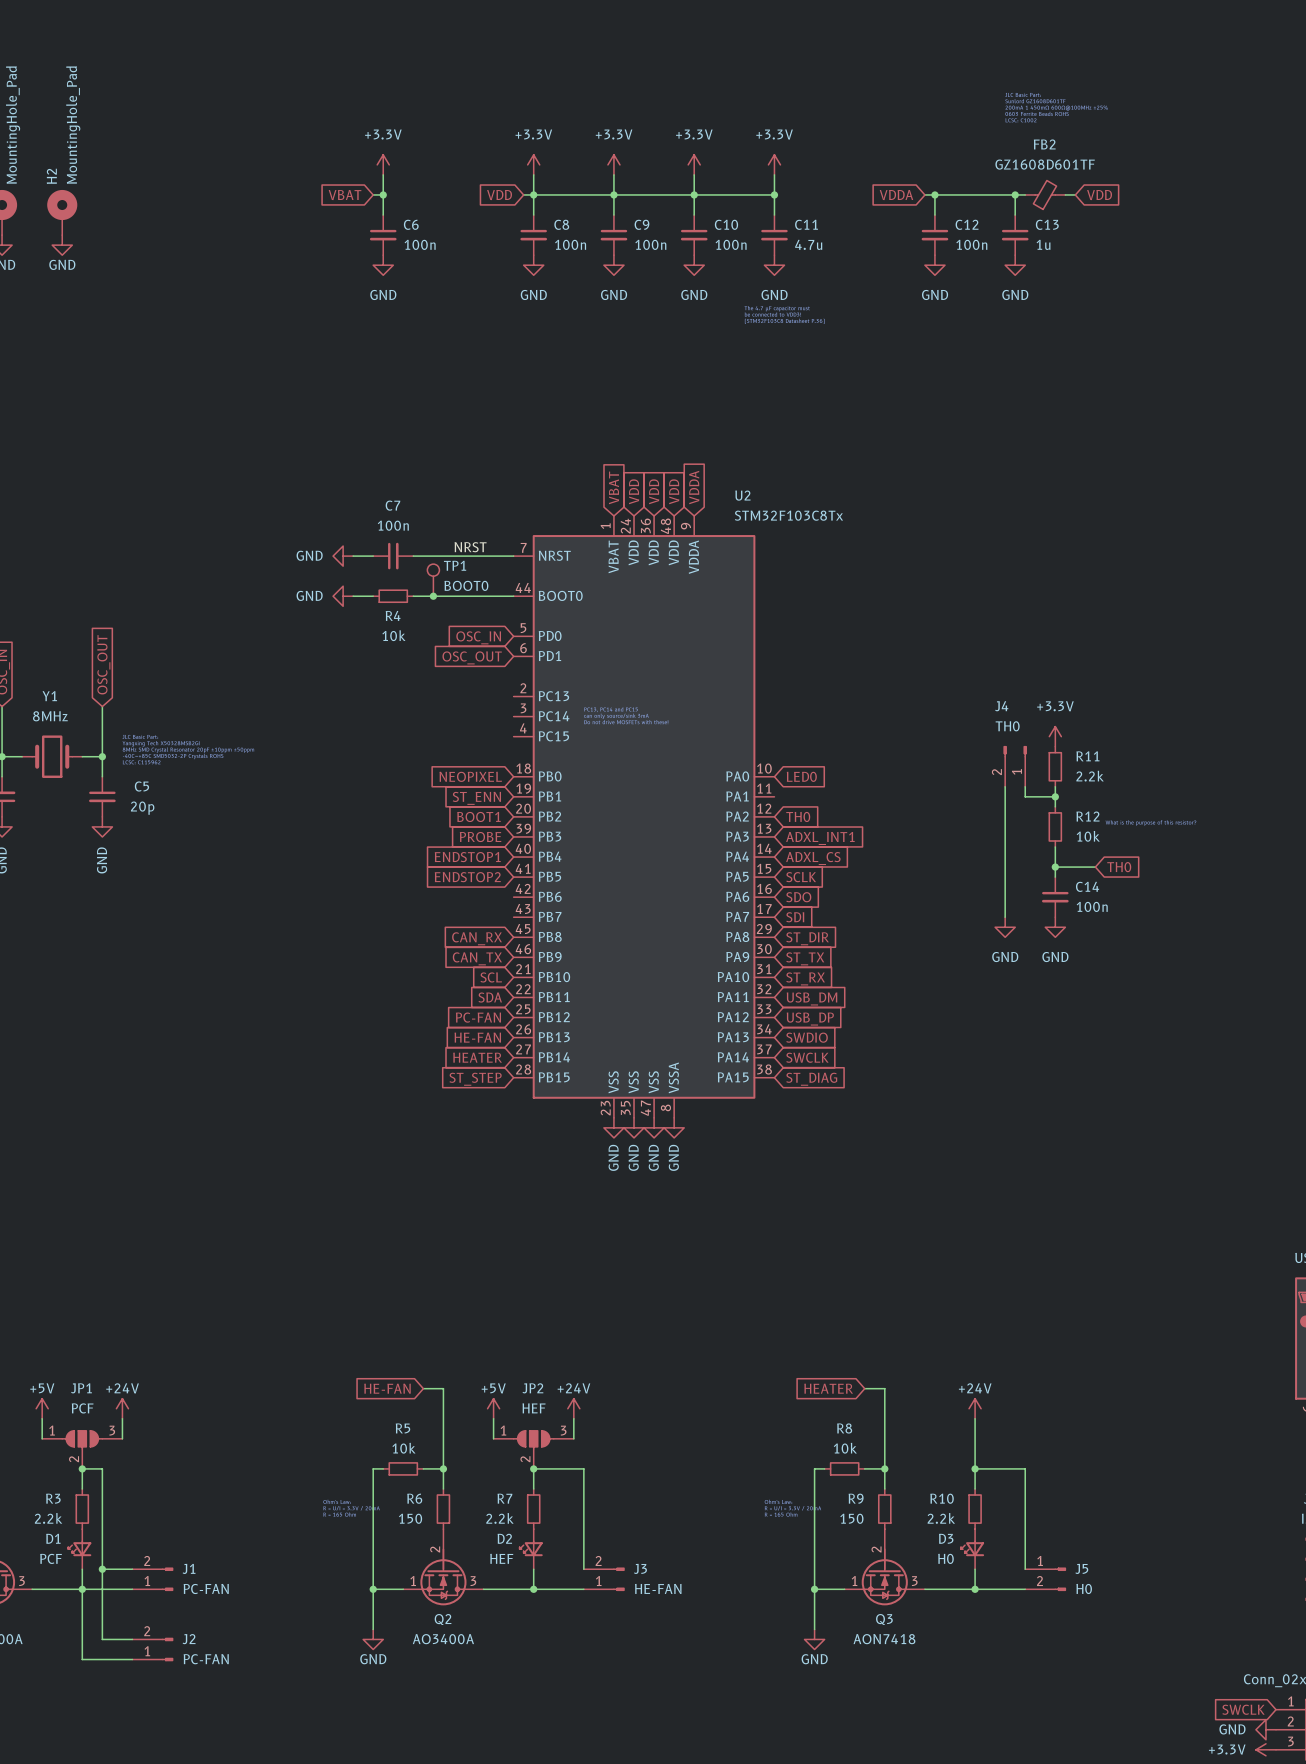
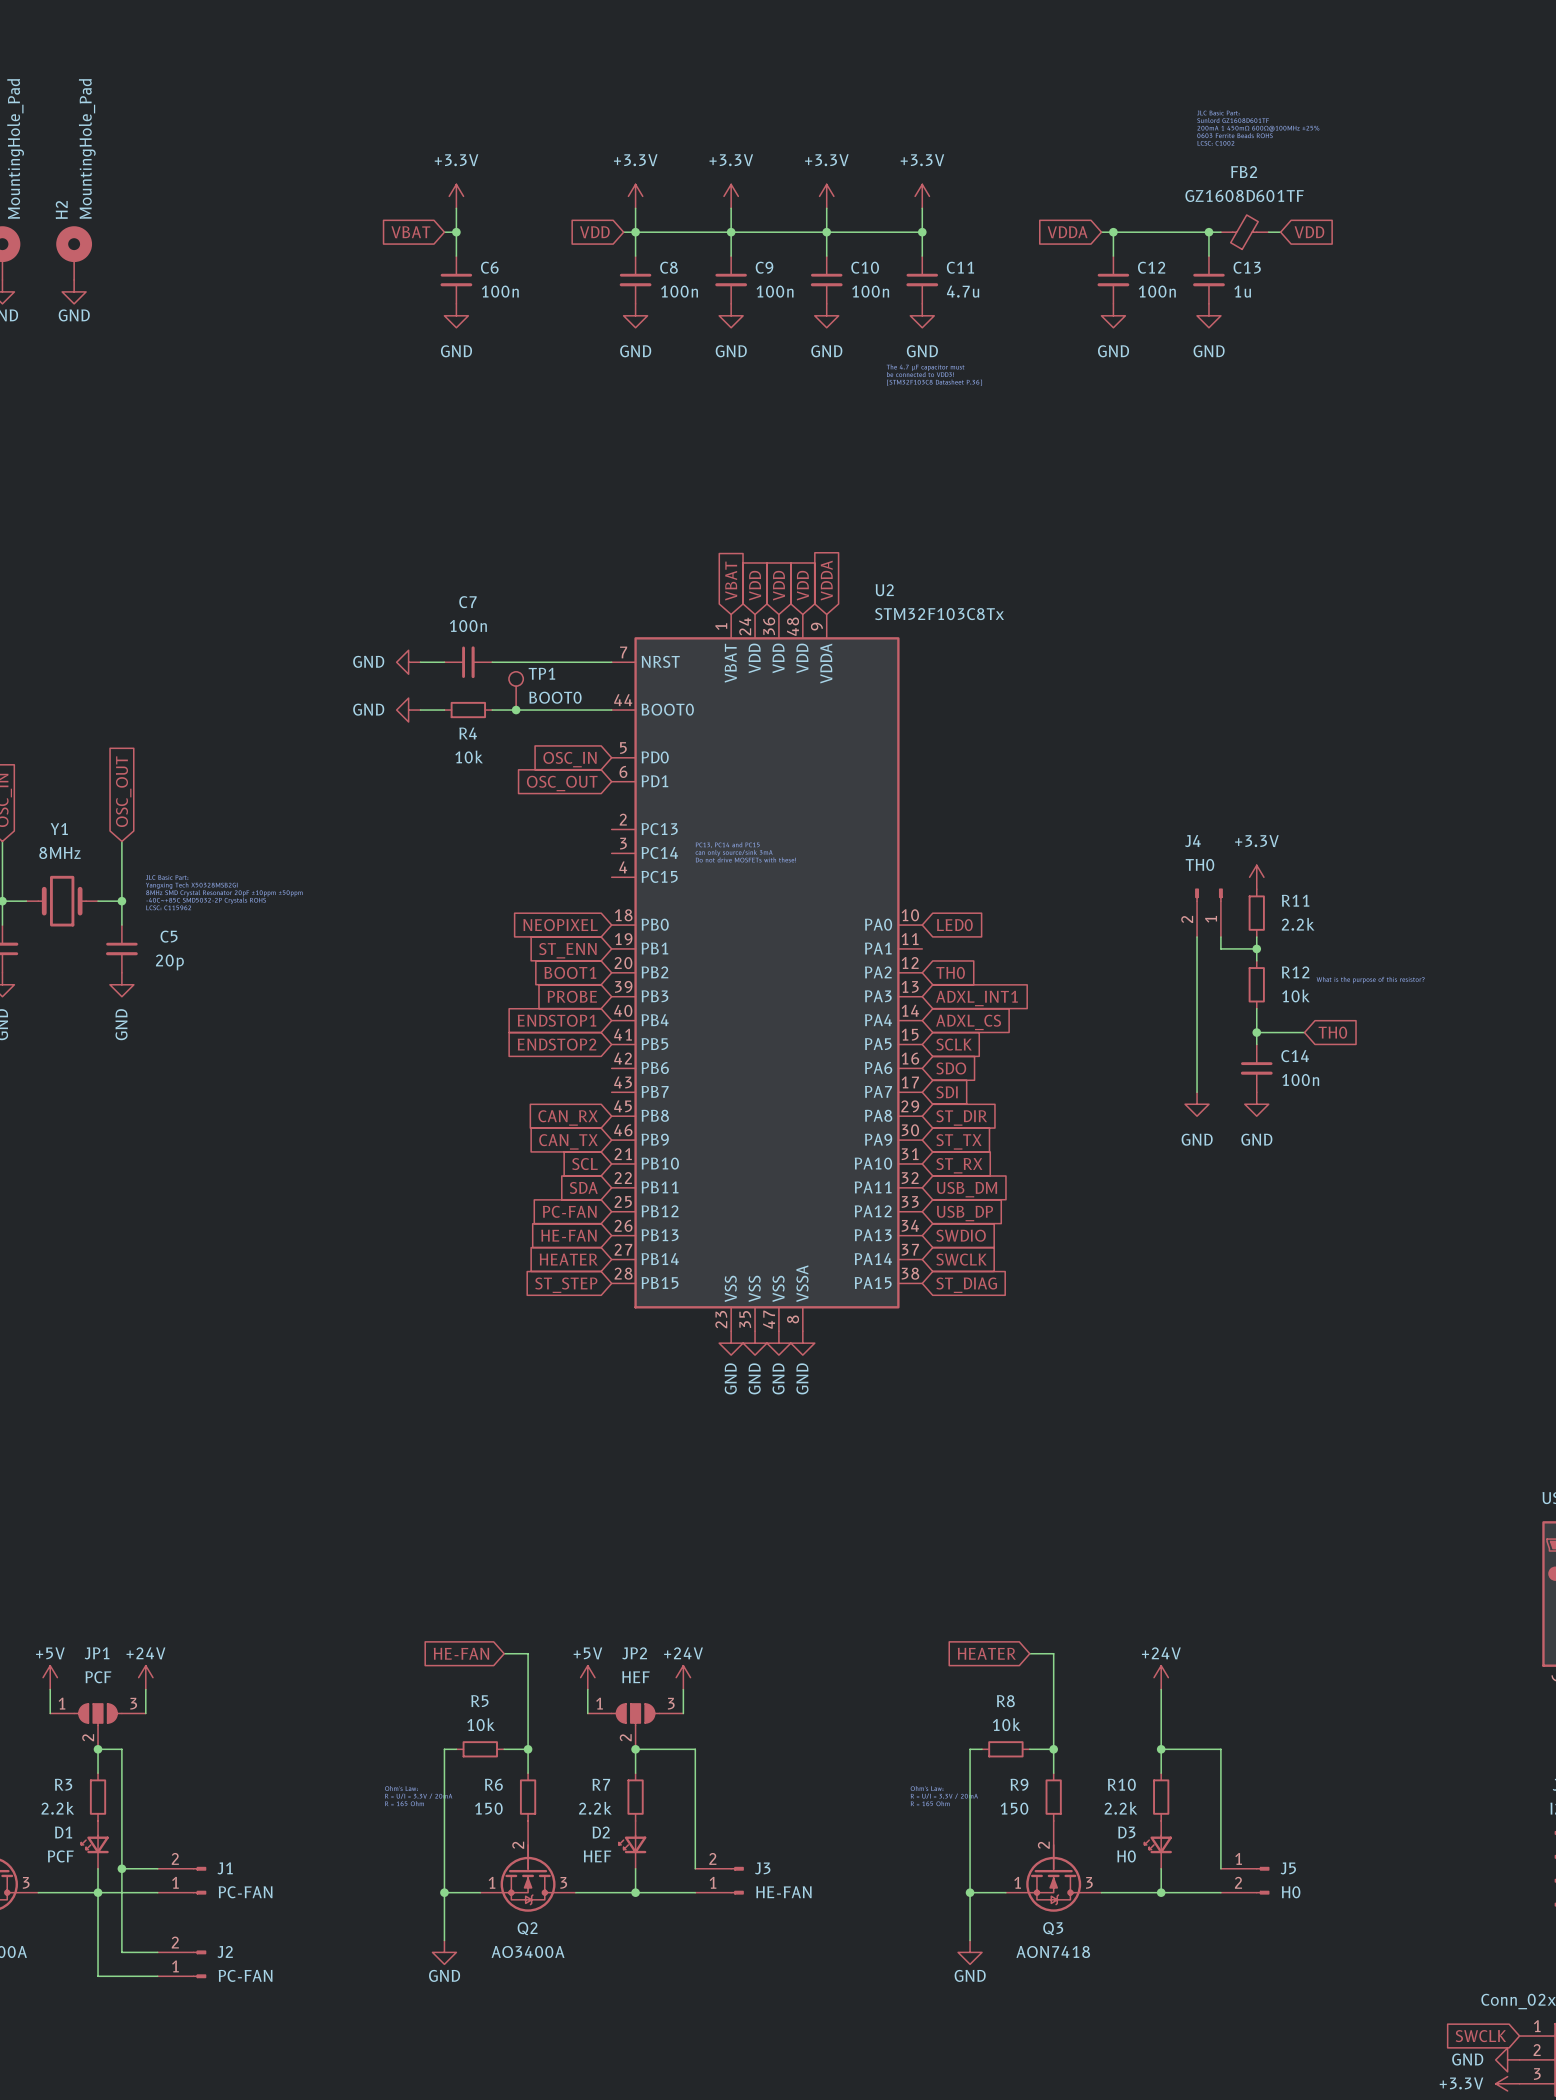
label: NRST (470, 547) -> none

